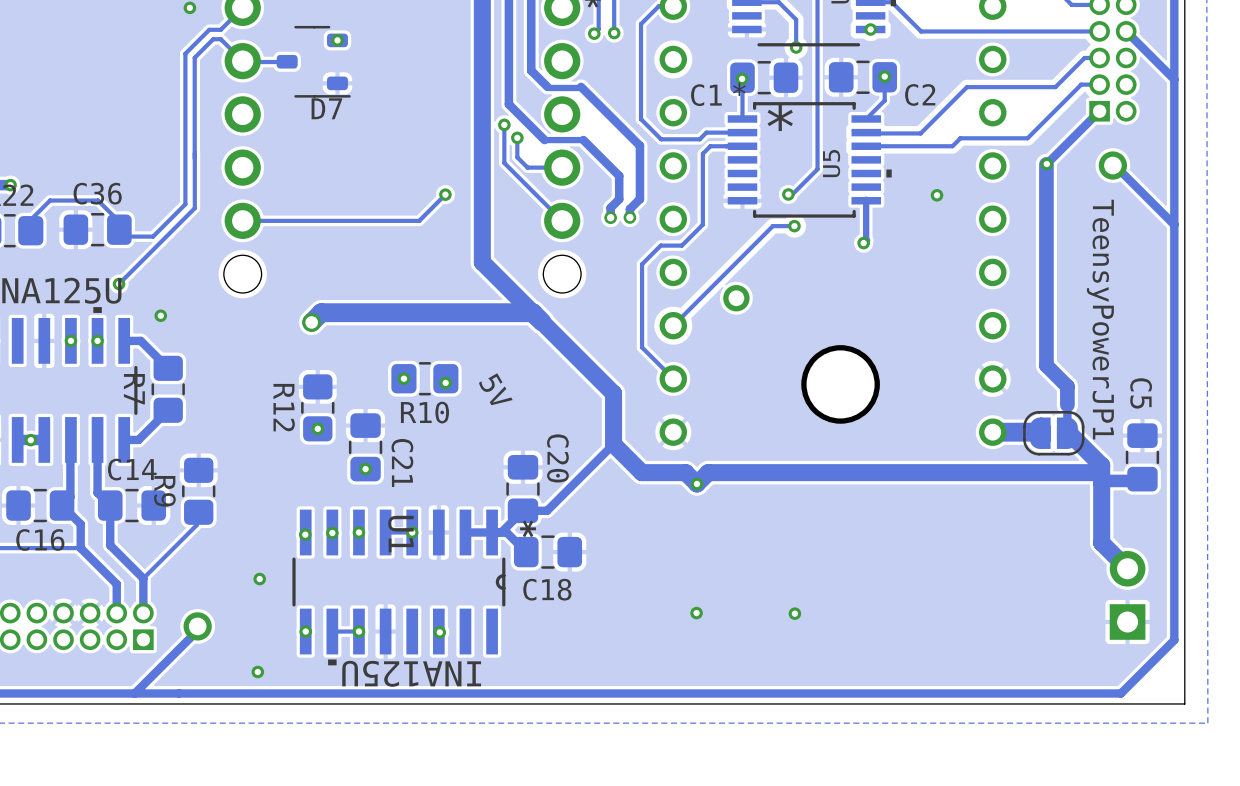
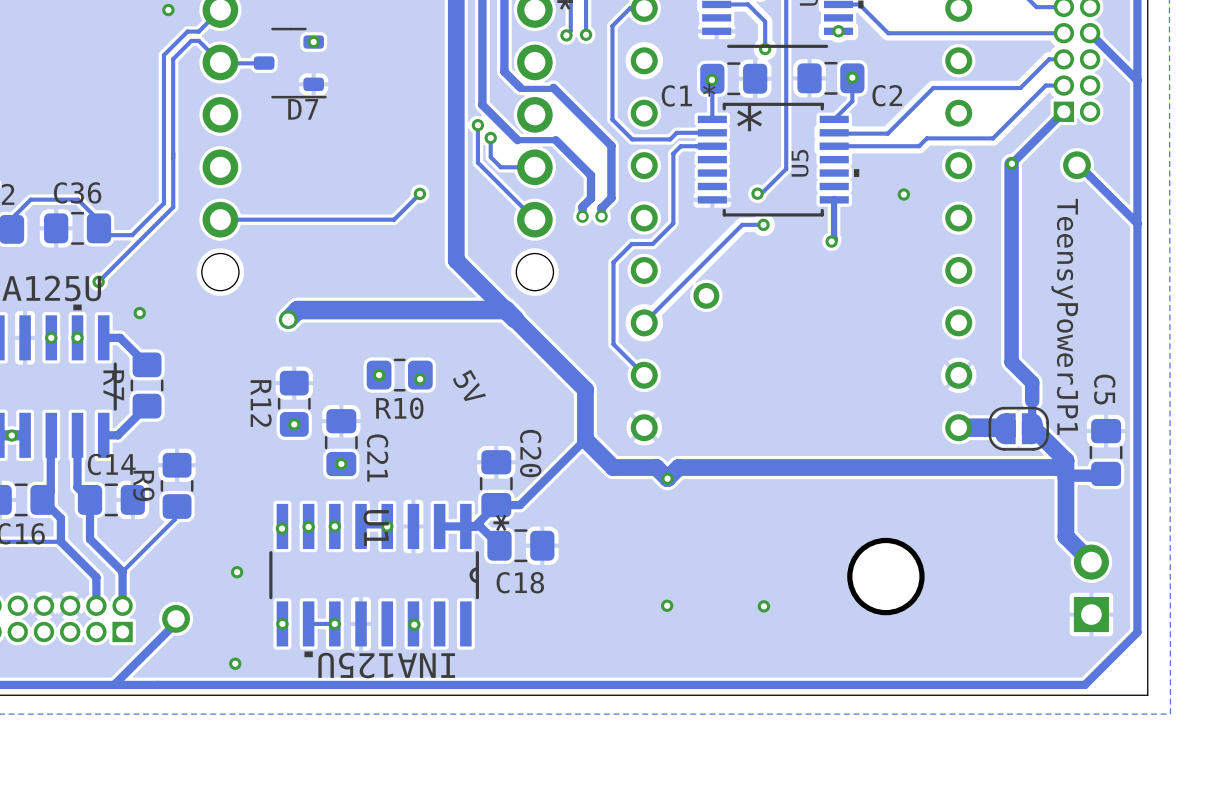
round board edge position: (840, 384) -> (885, 576)

